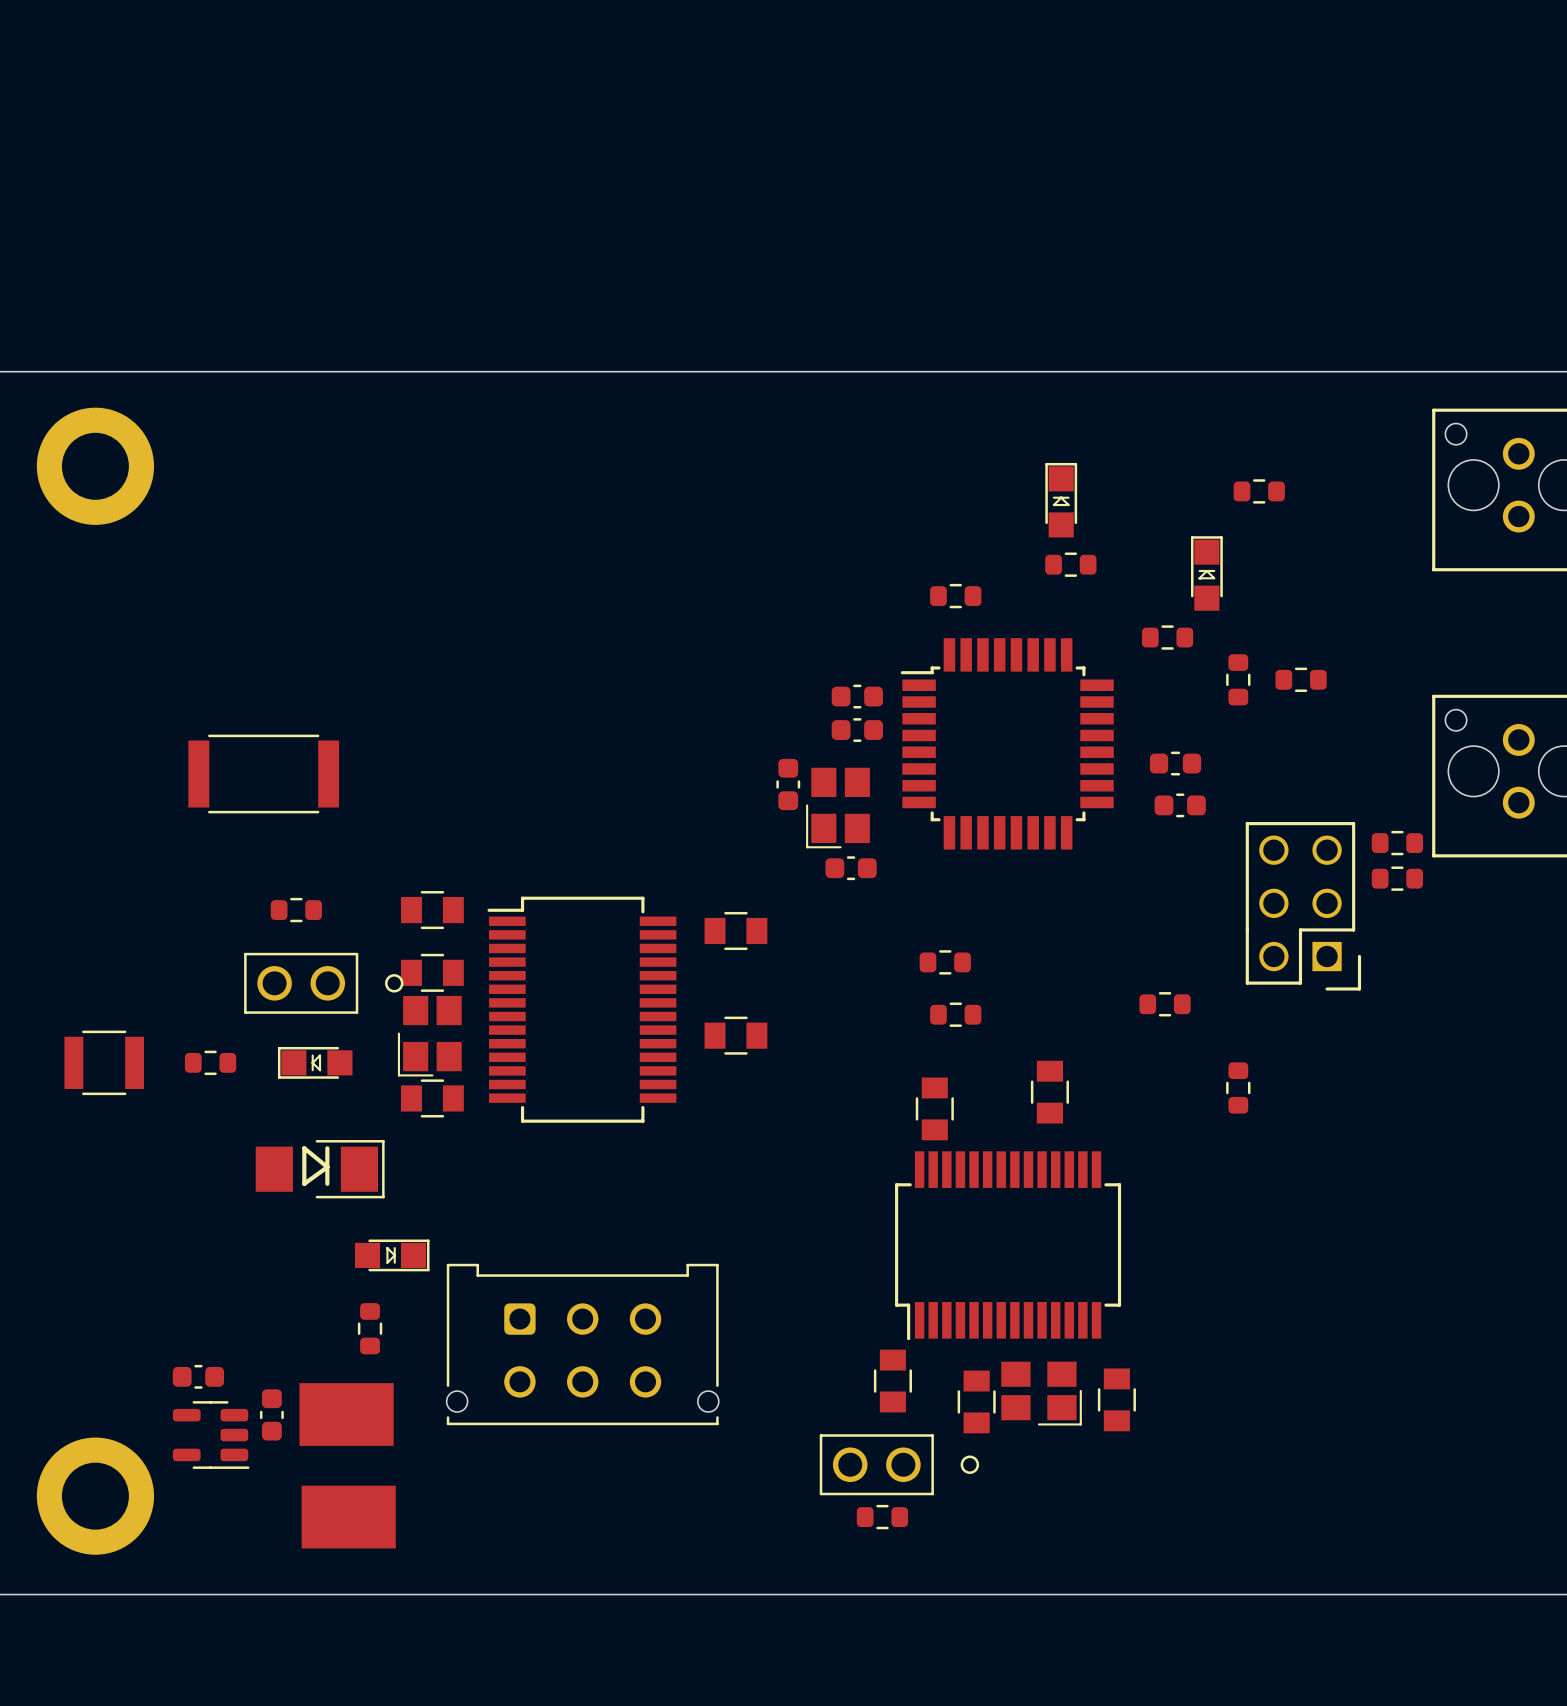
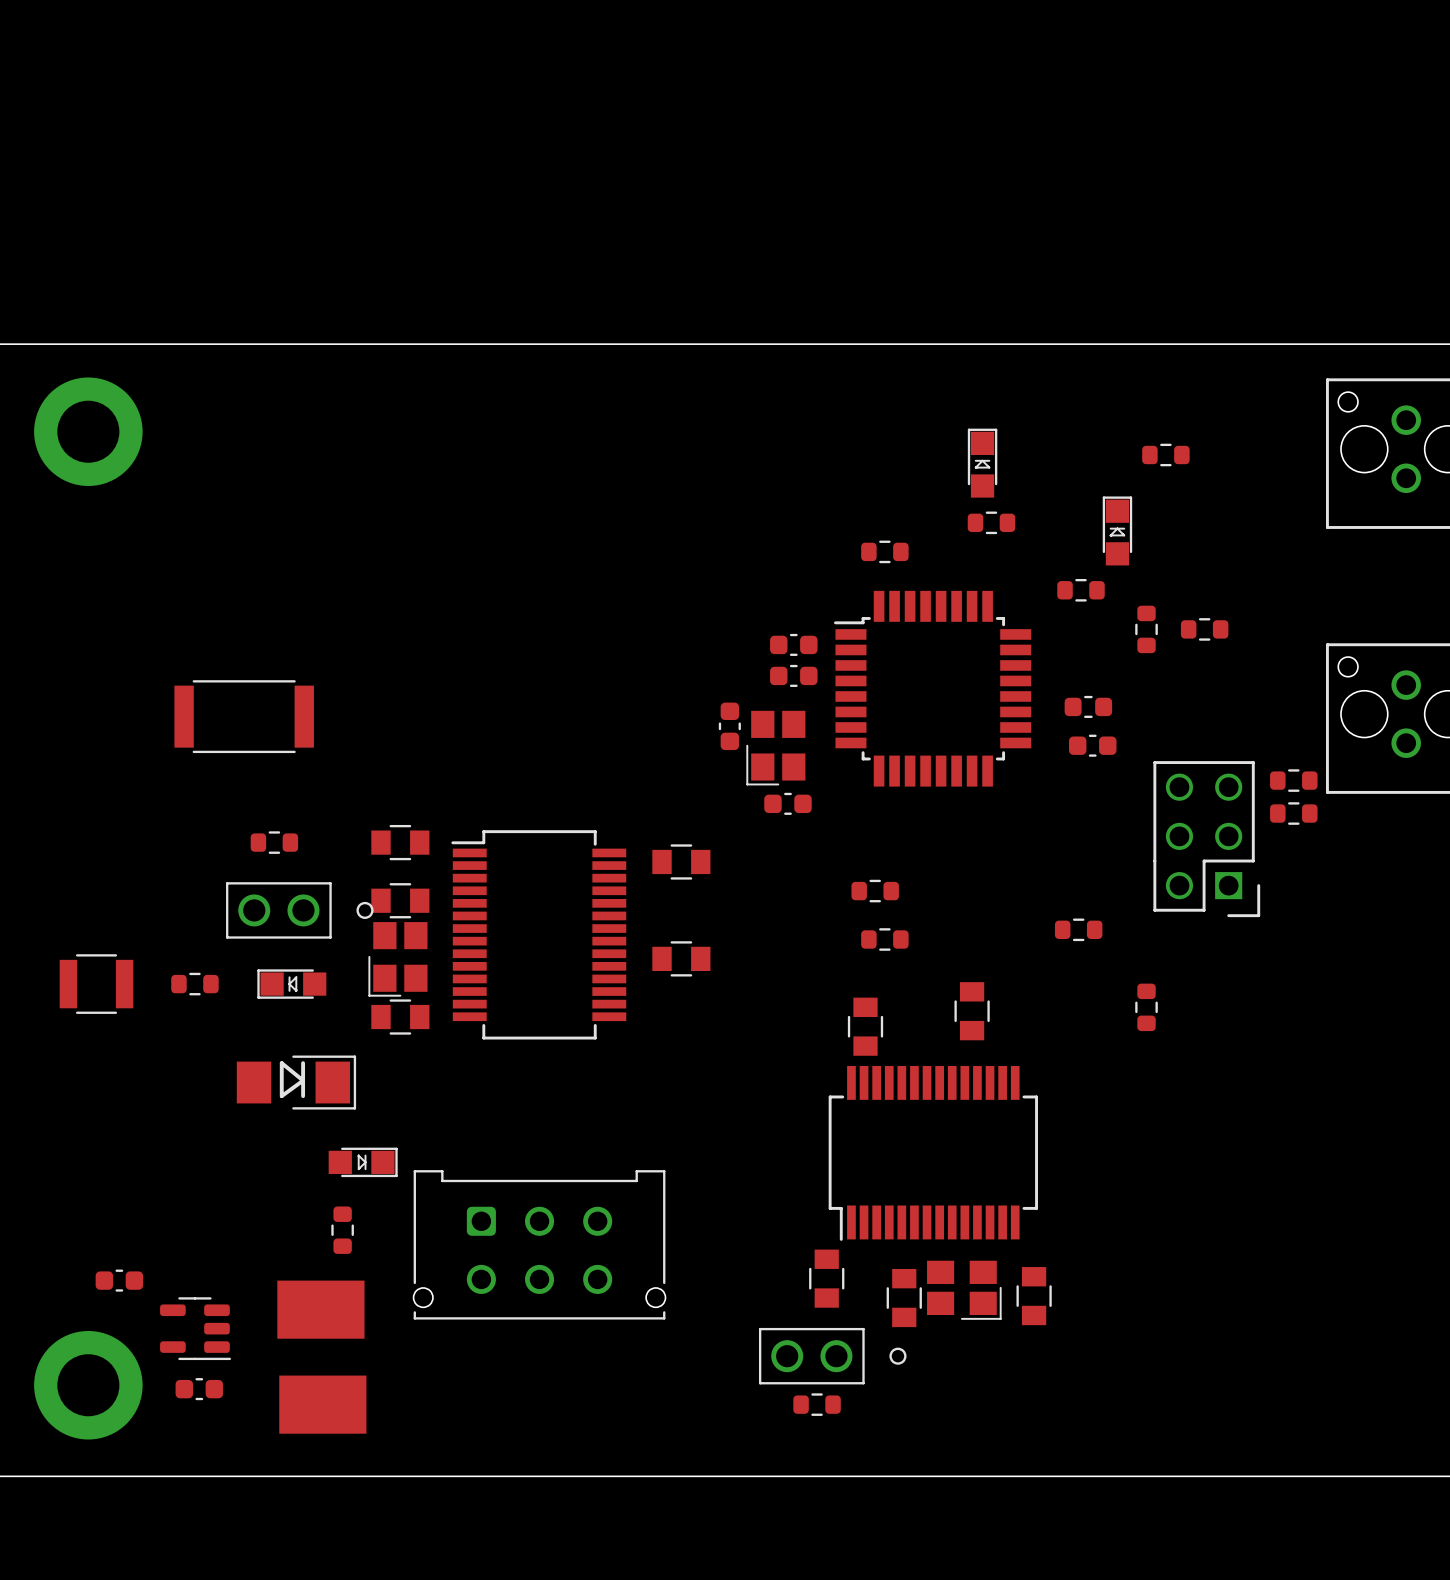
part: (198, 1376) -> none
part: none -> (119, 1280)
part: (271, 1414) -> none
part: none -> (199, 1389)

